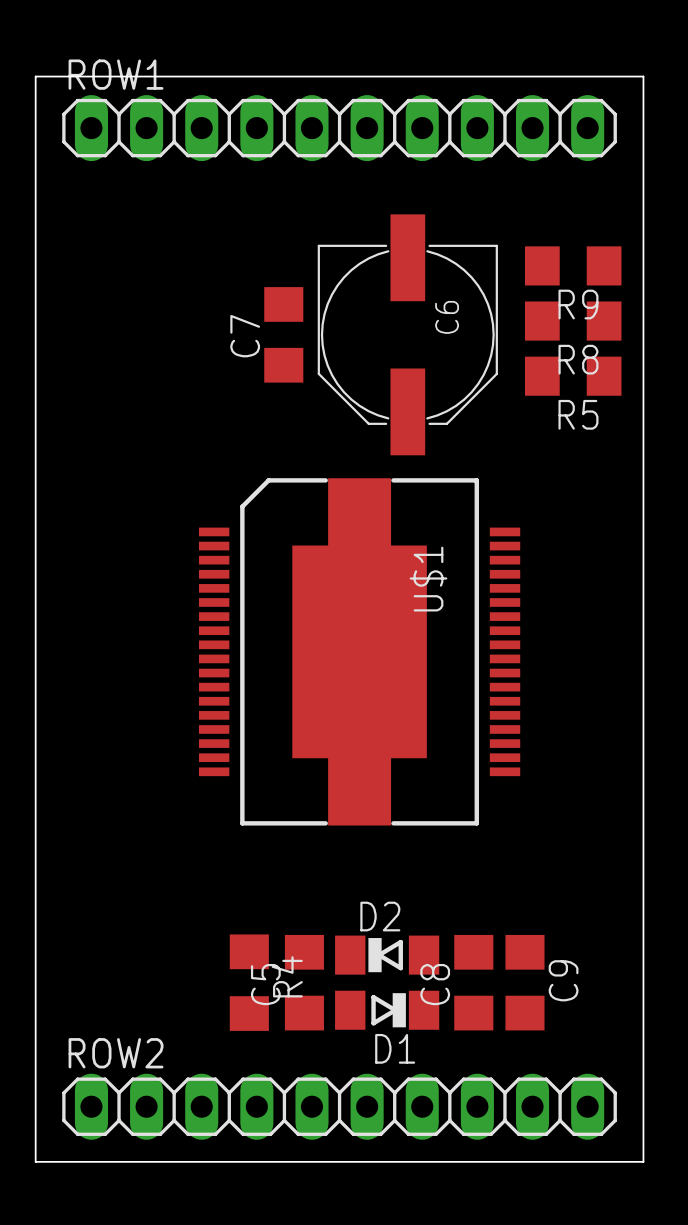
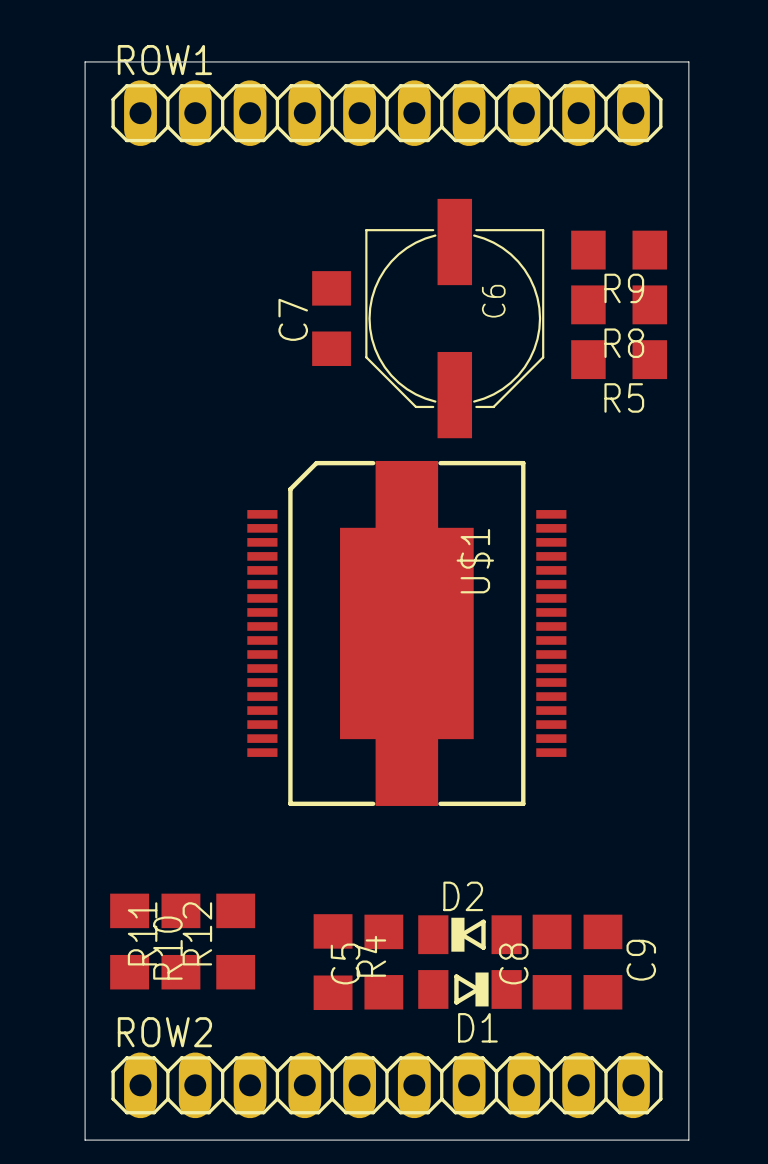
D2 position: (387, 955) -> (469, 934)
R10: none -> (129, 941)
R11: none -> (180, 941)
R12: none -> (235, 941)
R4 position: (249, 982) -> (333, 962)
C5 position: (304, 982) -> (383, 962)
C8 position: (473, 982) -> (552, 962)
C9 position: (524, 982) -> (602, 962)
D1 position: (387, 1010) -> (469, 989)

